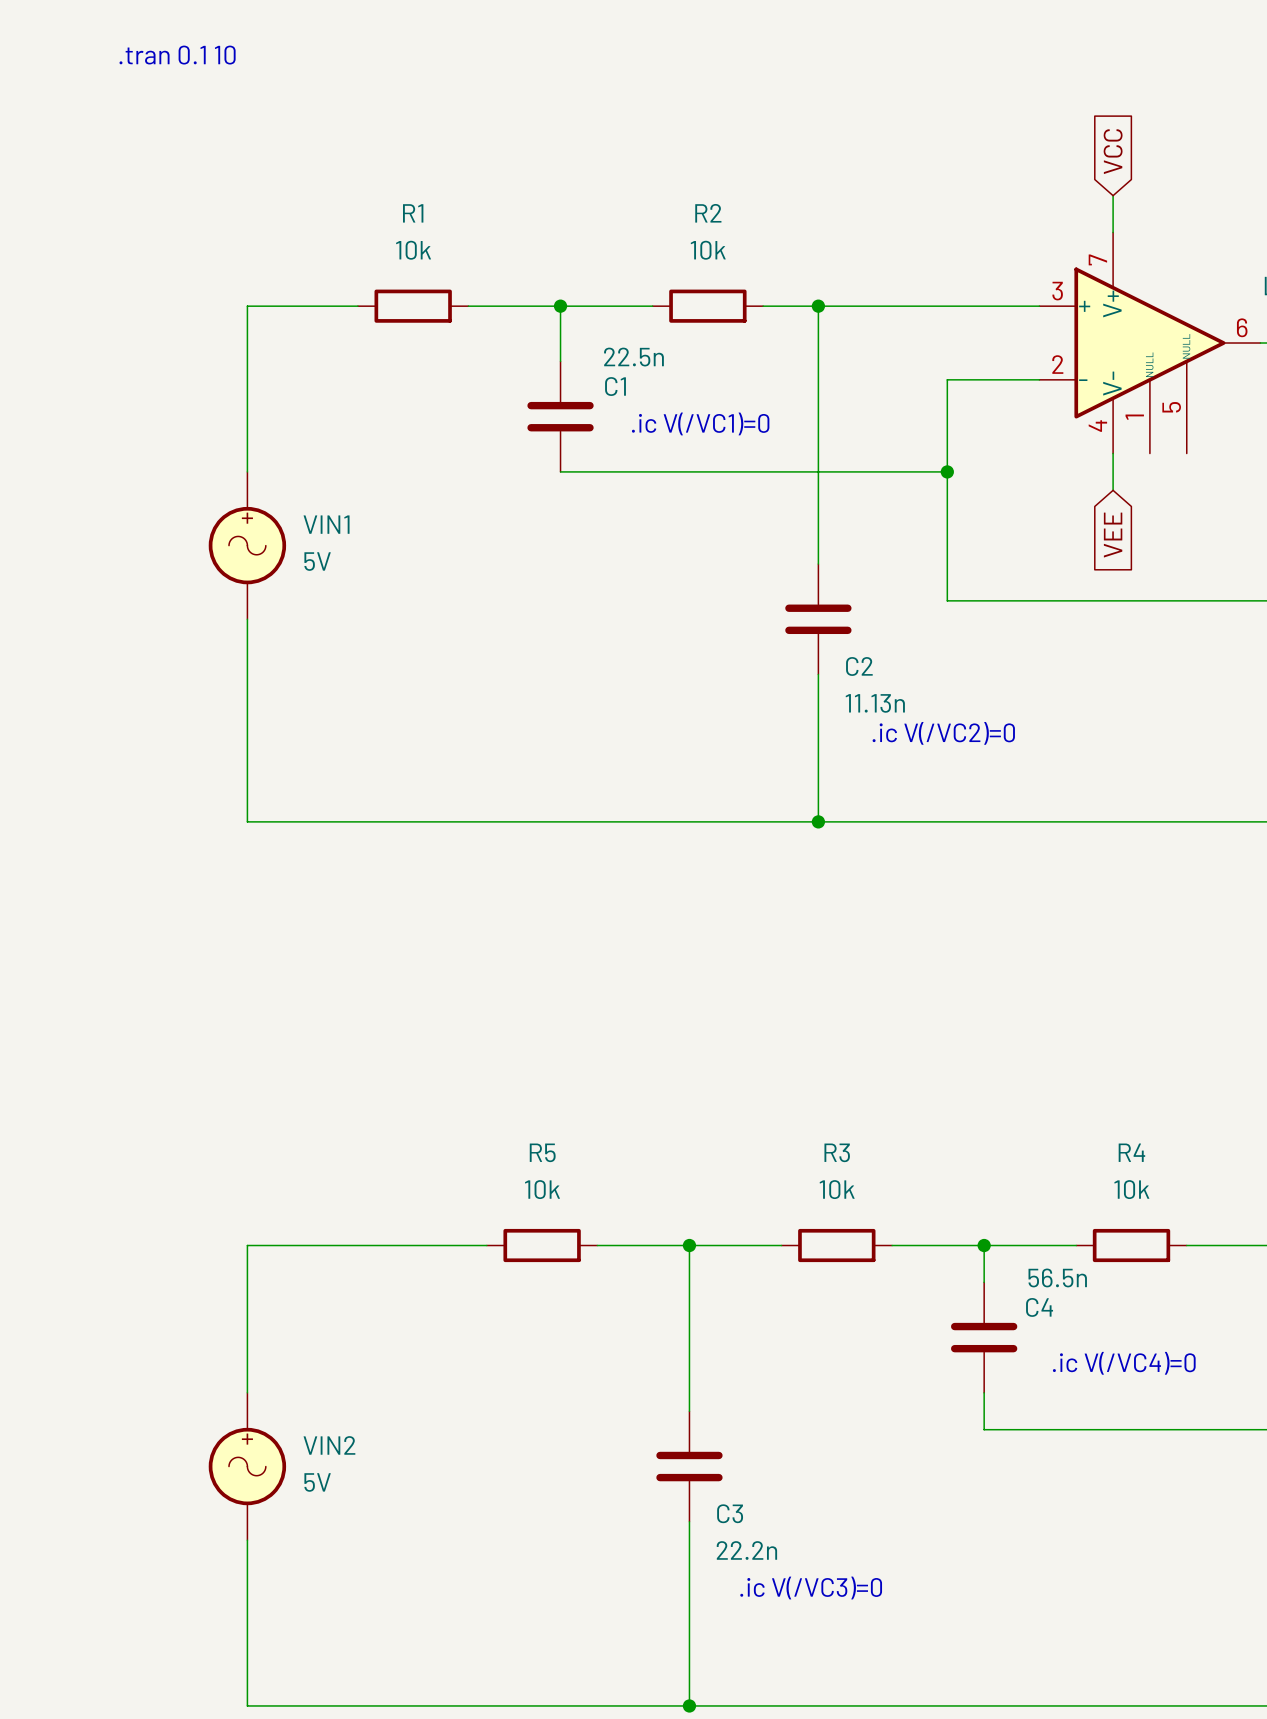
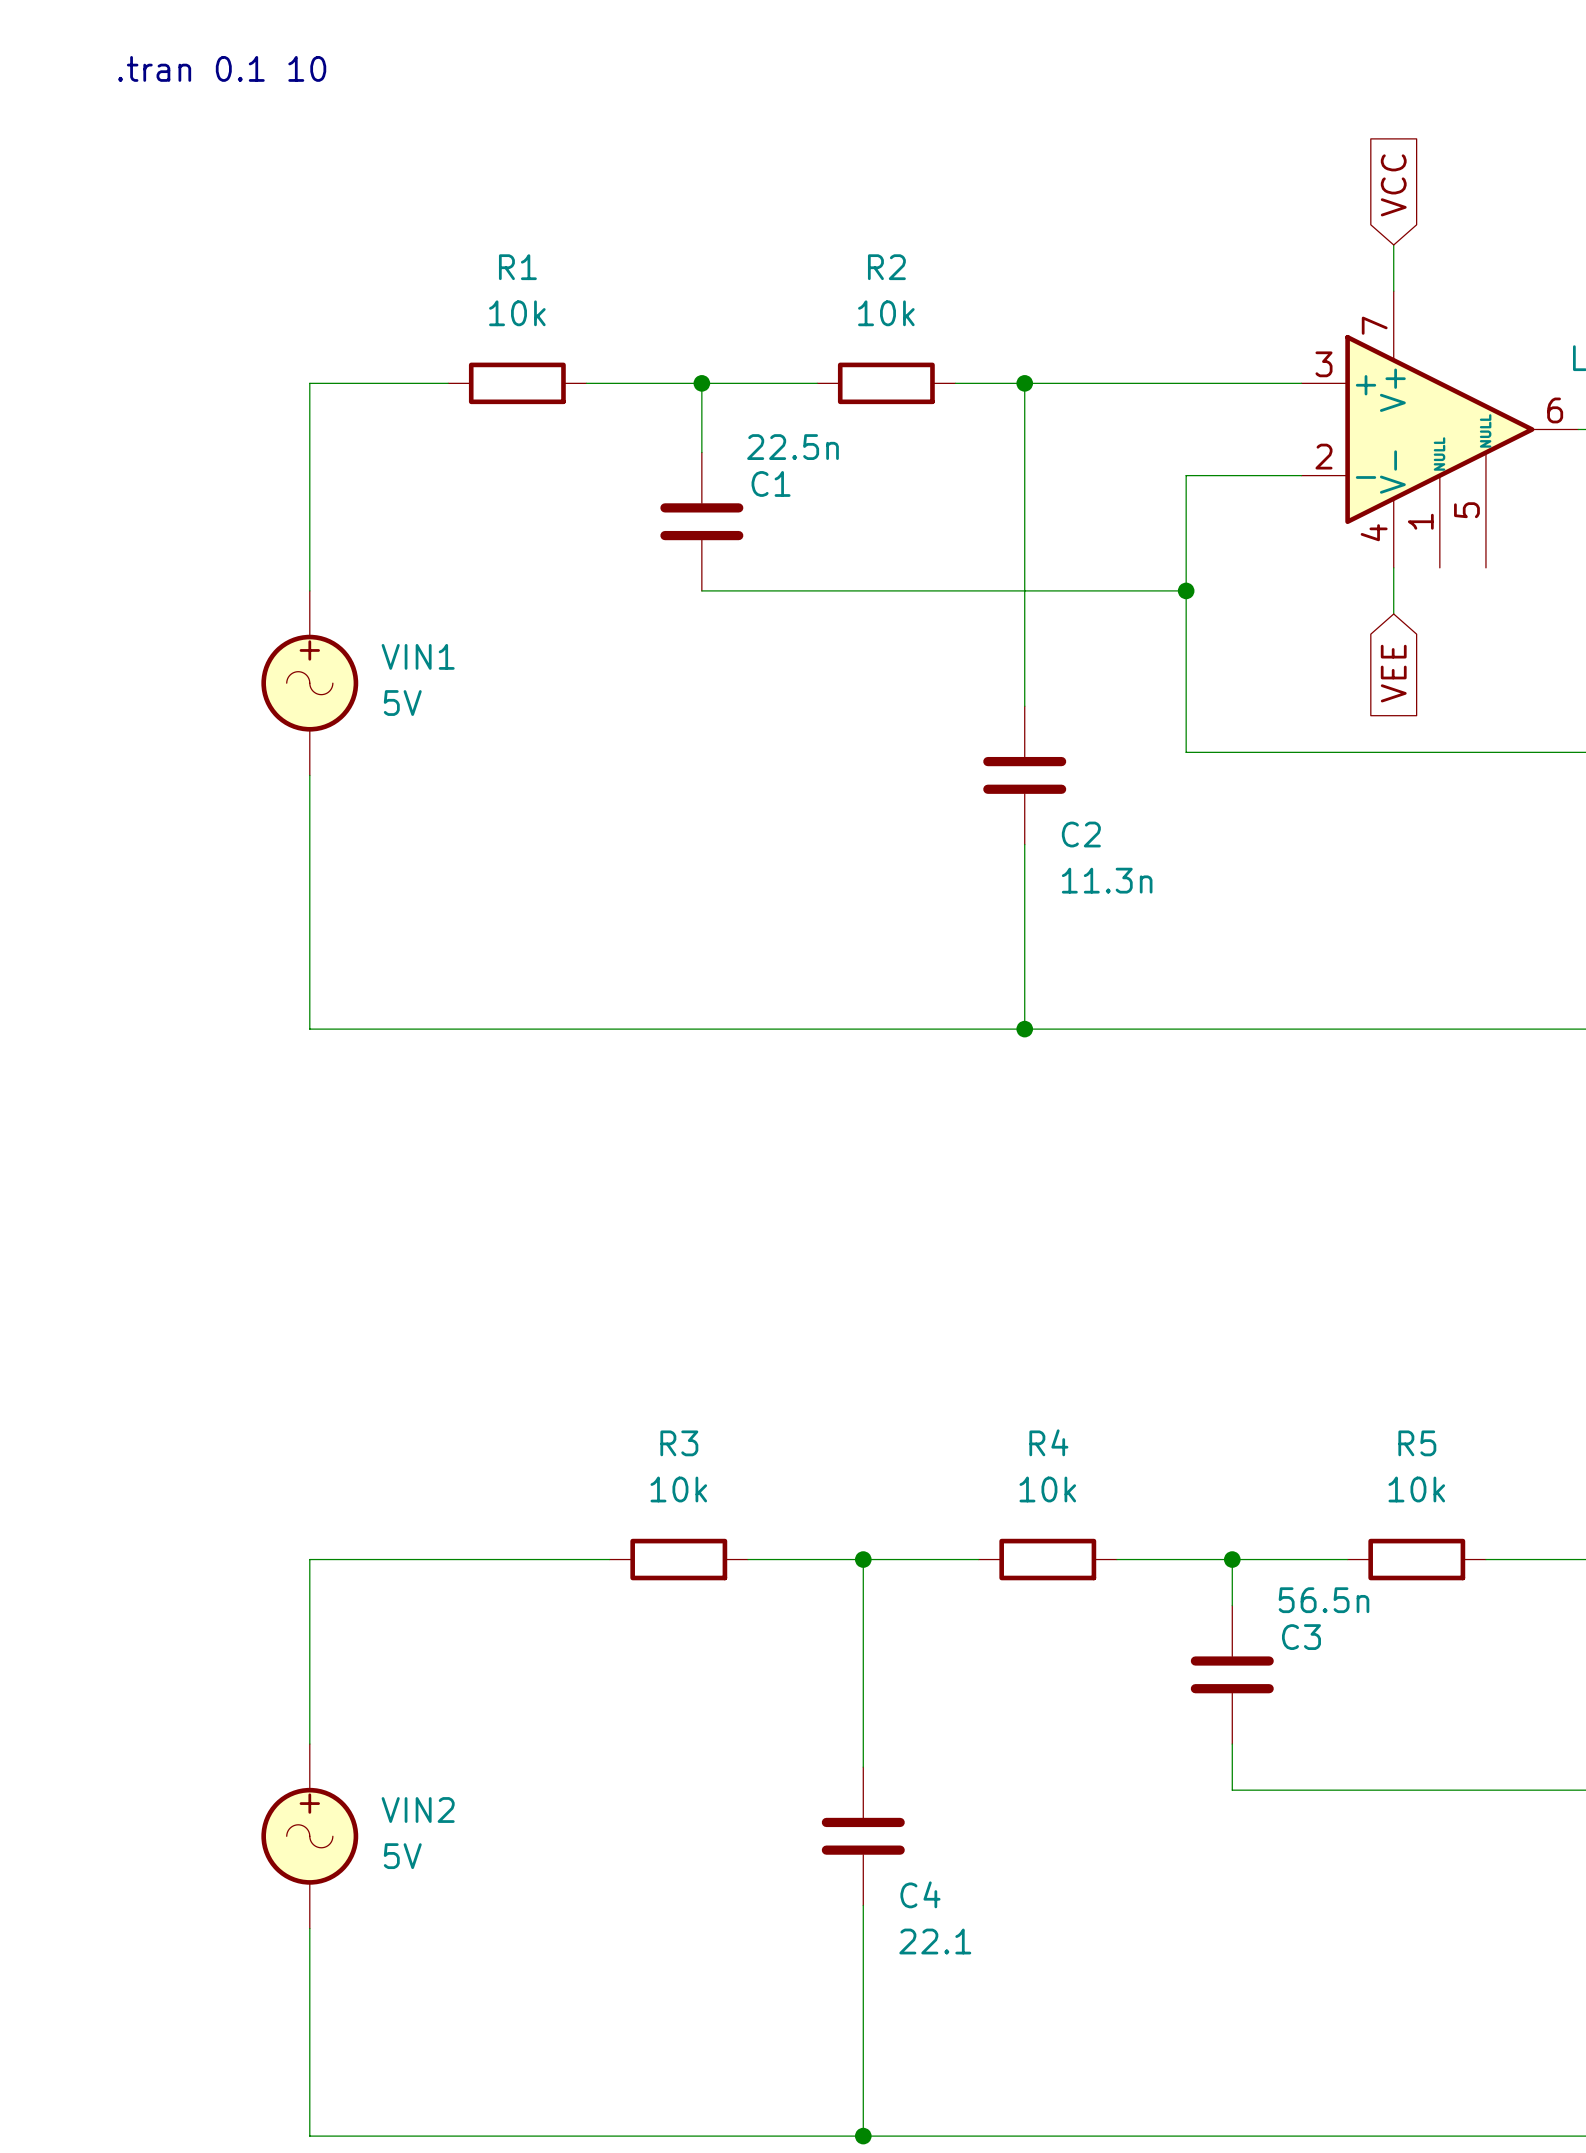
text: .ic V(/VC1)=0 (700, 423) -> none
C2 value: 11.13n (875, 703) -> 11.3n (1107, 880)
text: .ic V(/VC2)=0 (943, 733) -> none
R5 name: R5 (542, 1152) -> R3 (679, 1443)
R3 name: R3 (837, 1152) -> R4 (1048, 1442)
R4 name: R4 (1131, 1152) -> R5 (1417, 1443)
C4 name: C4 (1039, 1307) -> C3 (1301, 1637)
text: .ic V(/VC4)=0 (1124, 1363) -> none
C3 name: C3 (730, 1513) -> C4 (920, 1894)
C3 value: 22.2n (746, 1550) -> 22.1 (935, 1941)
text: .ic V(/VC3)=0 (811, 1588) -> none

